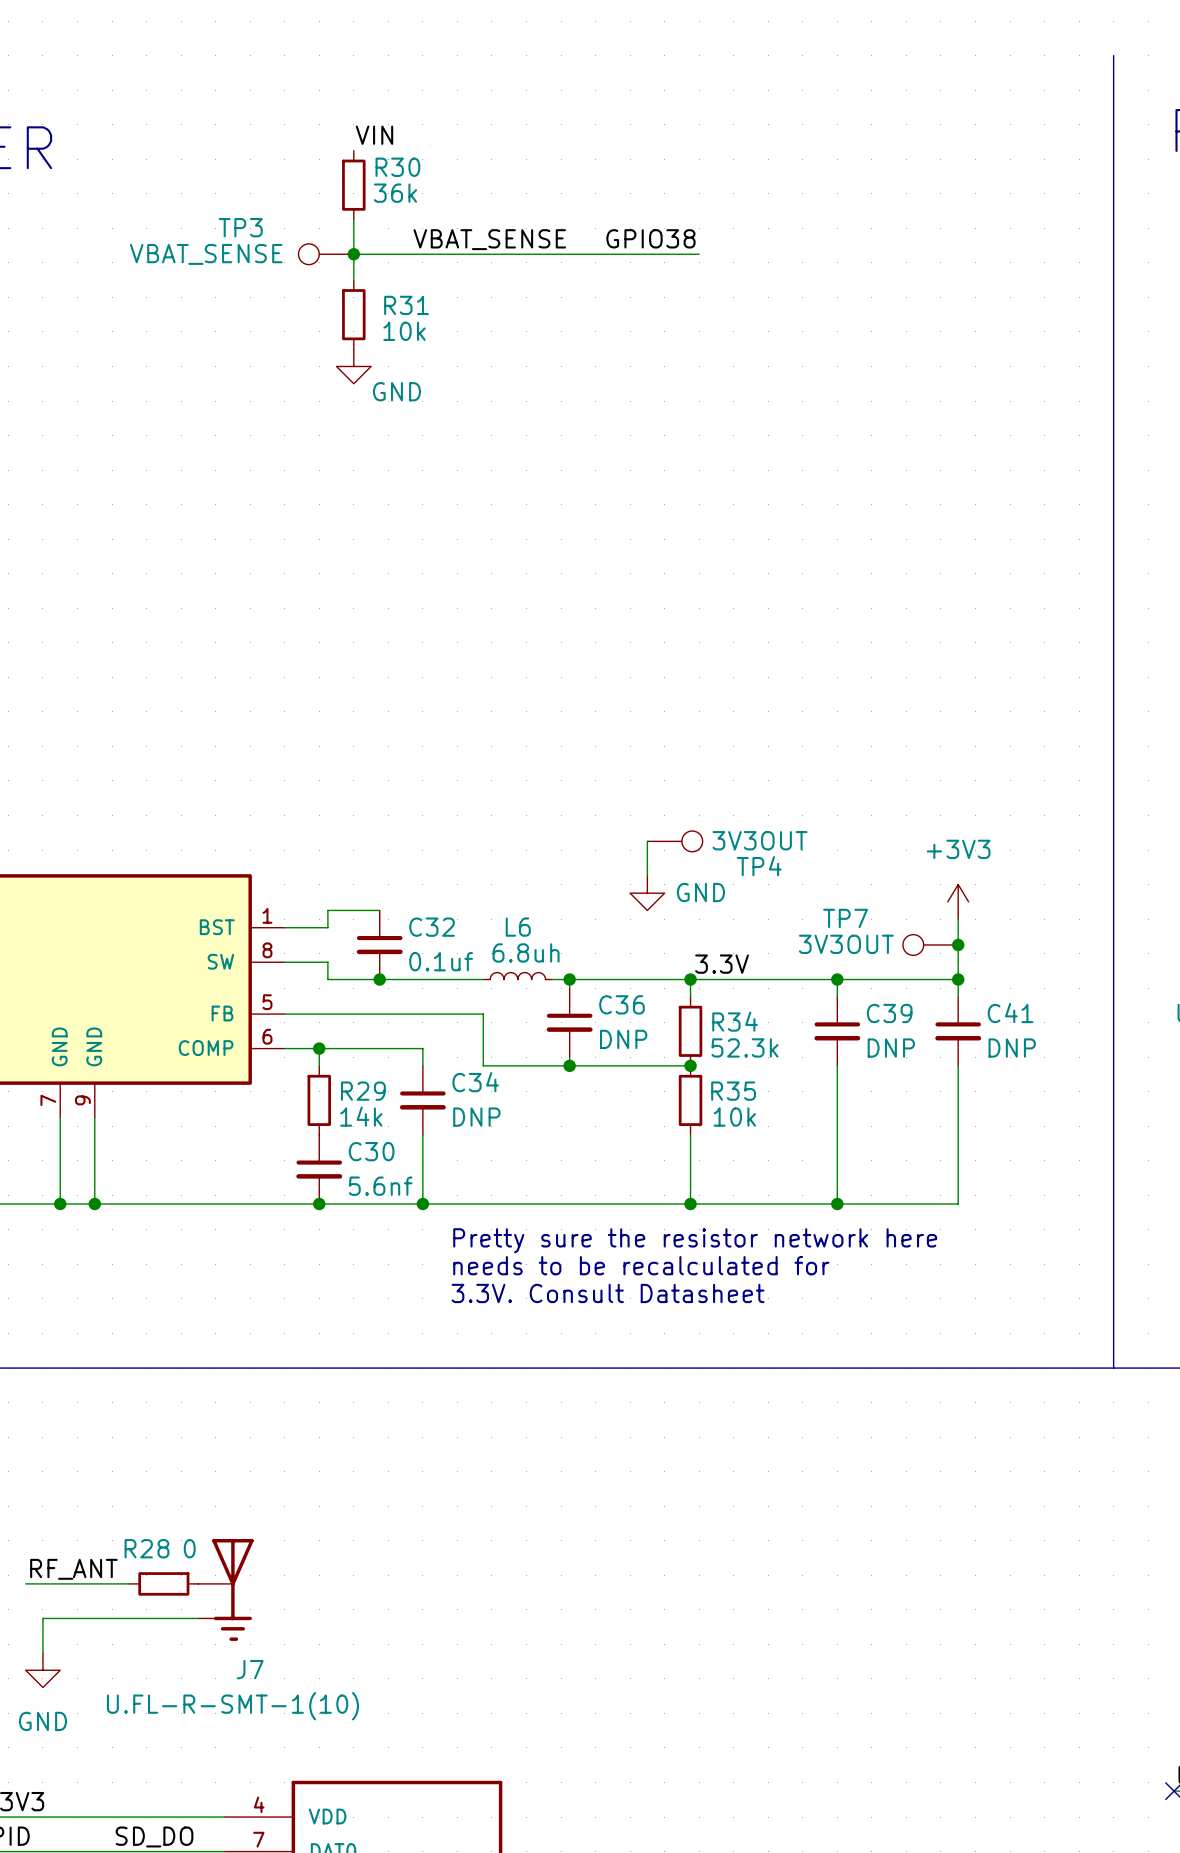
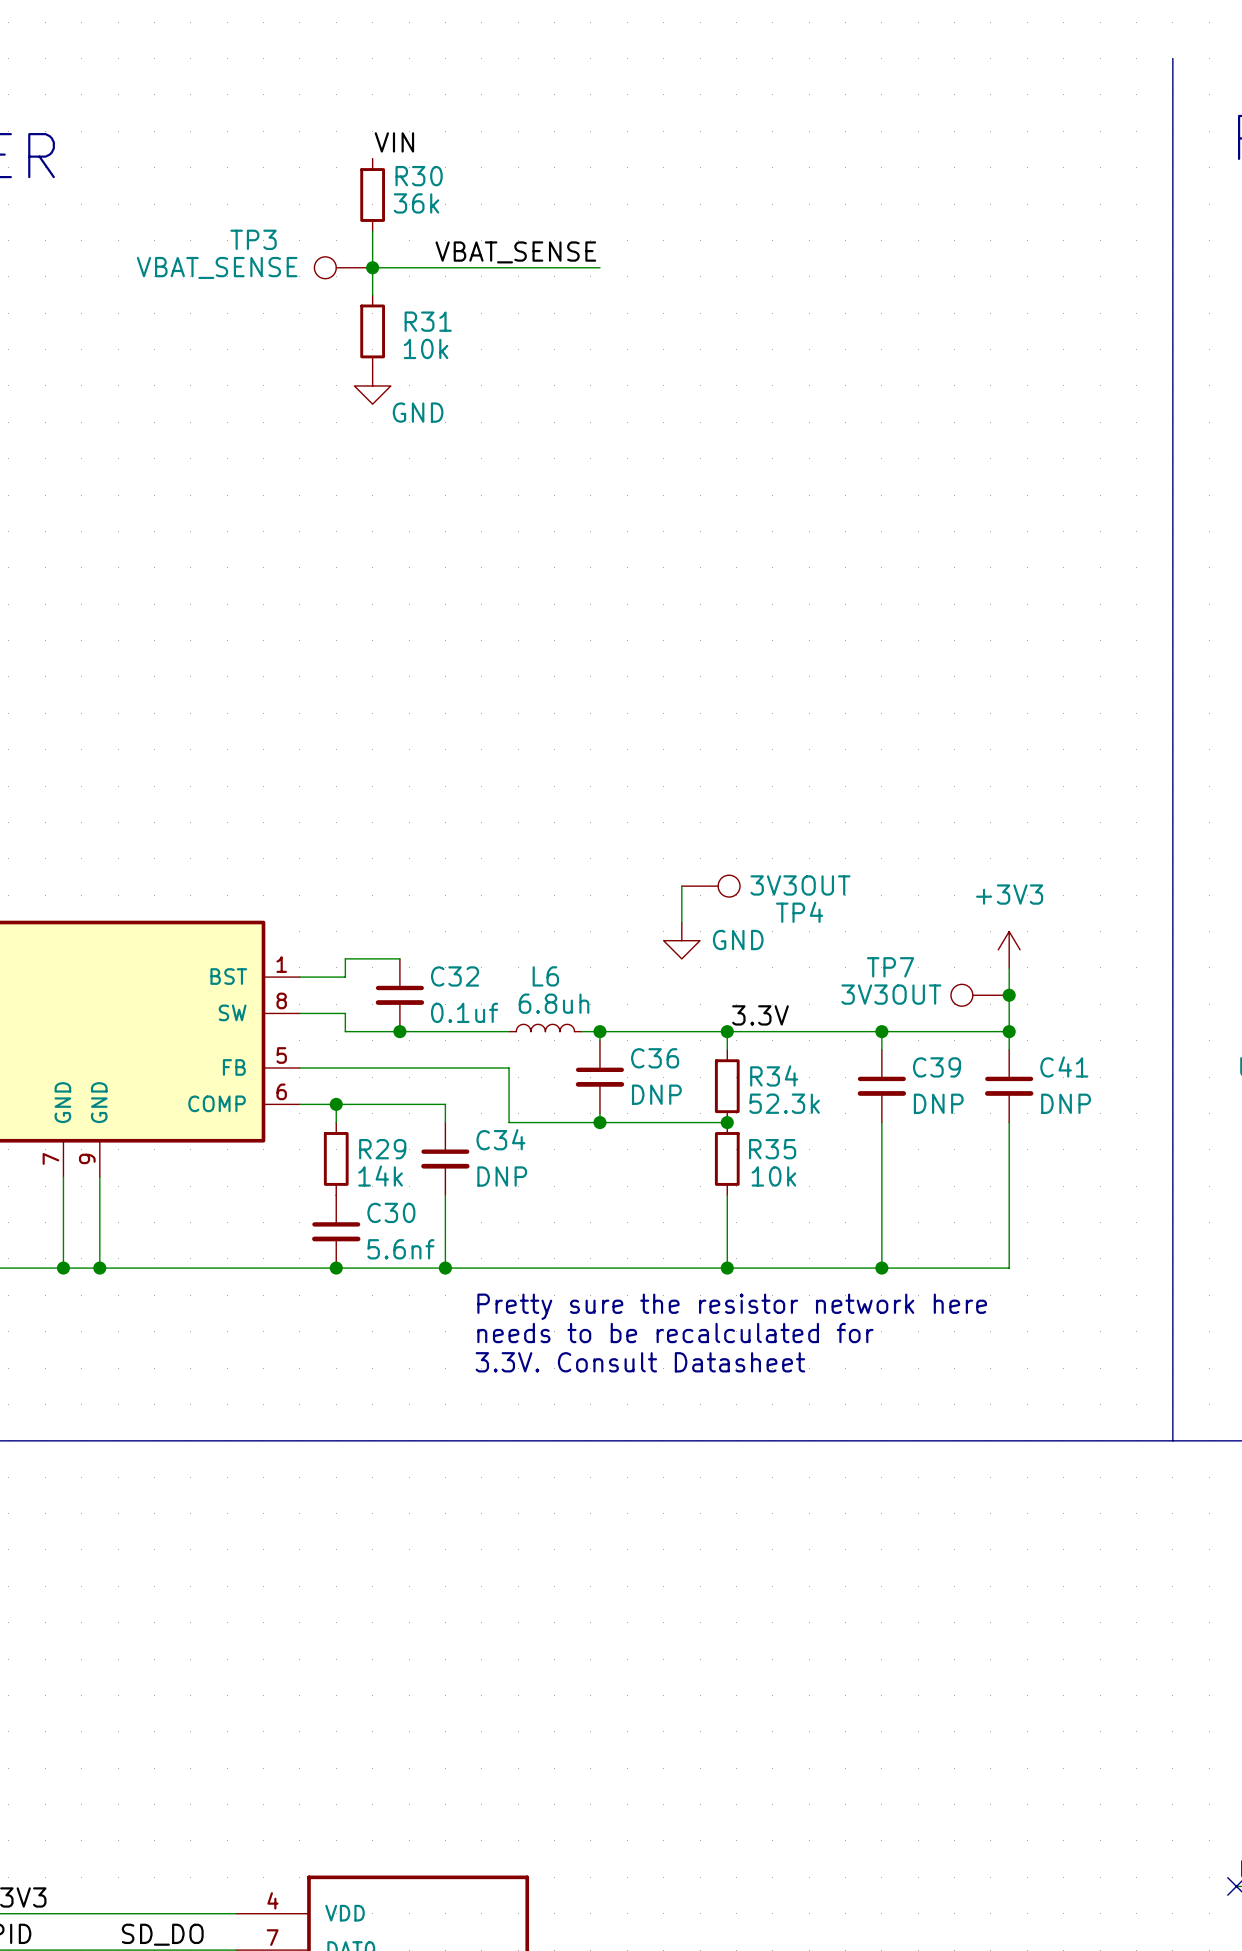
label: GPIO38 (650, 238) -> none
wire: (569, 254) (699, 254) -> none
label: RF_ANT (73, 1569) -> none
wire: (25, 1583) (129, 1583) -> none
R28: 0 (163, 1583) -> none
J7: U.FL-R-SMT-1(10) (226, 1589) -> none
wire: (198, 1618) (42, 1618) (42, 1652) -> none
power symbol: GND (42, 1670) -> none

